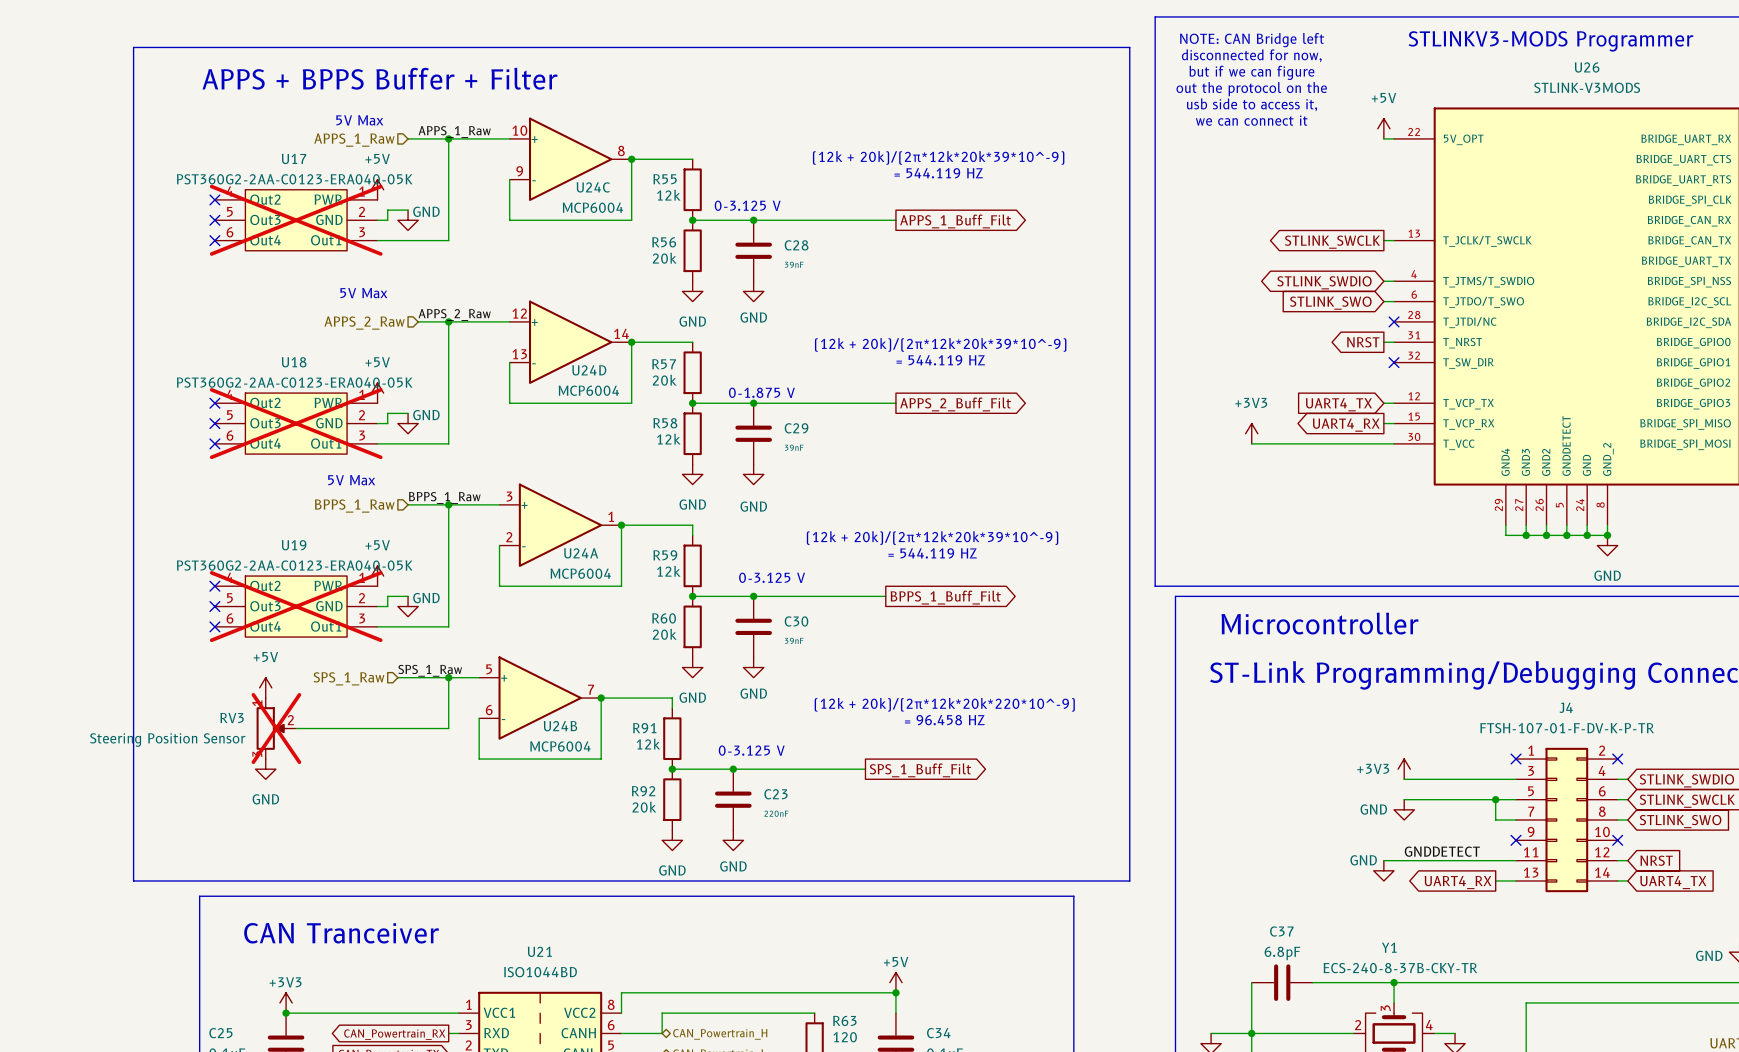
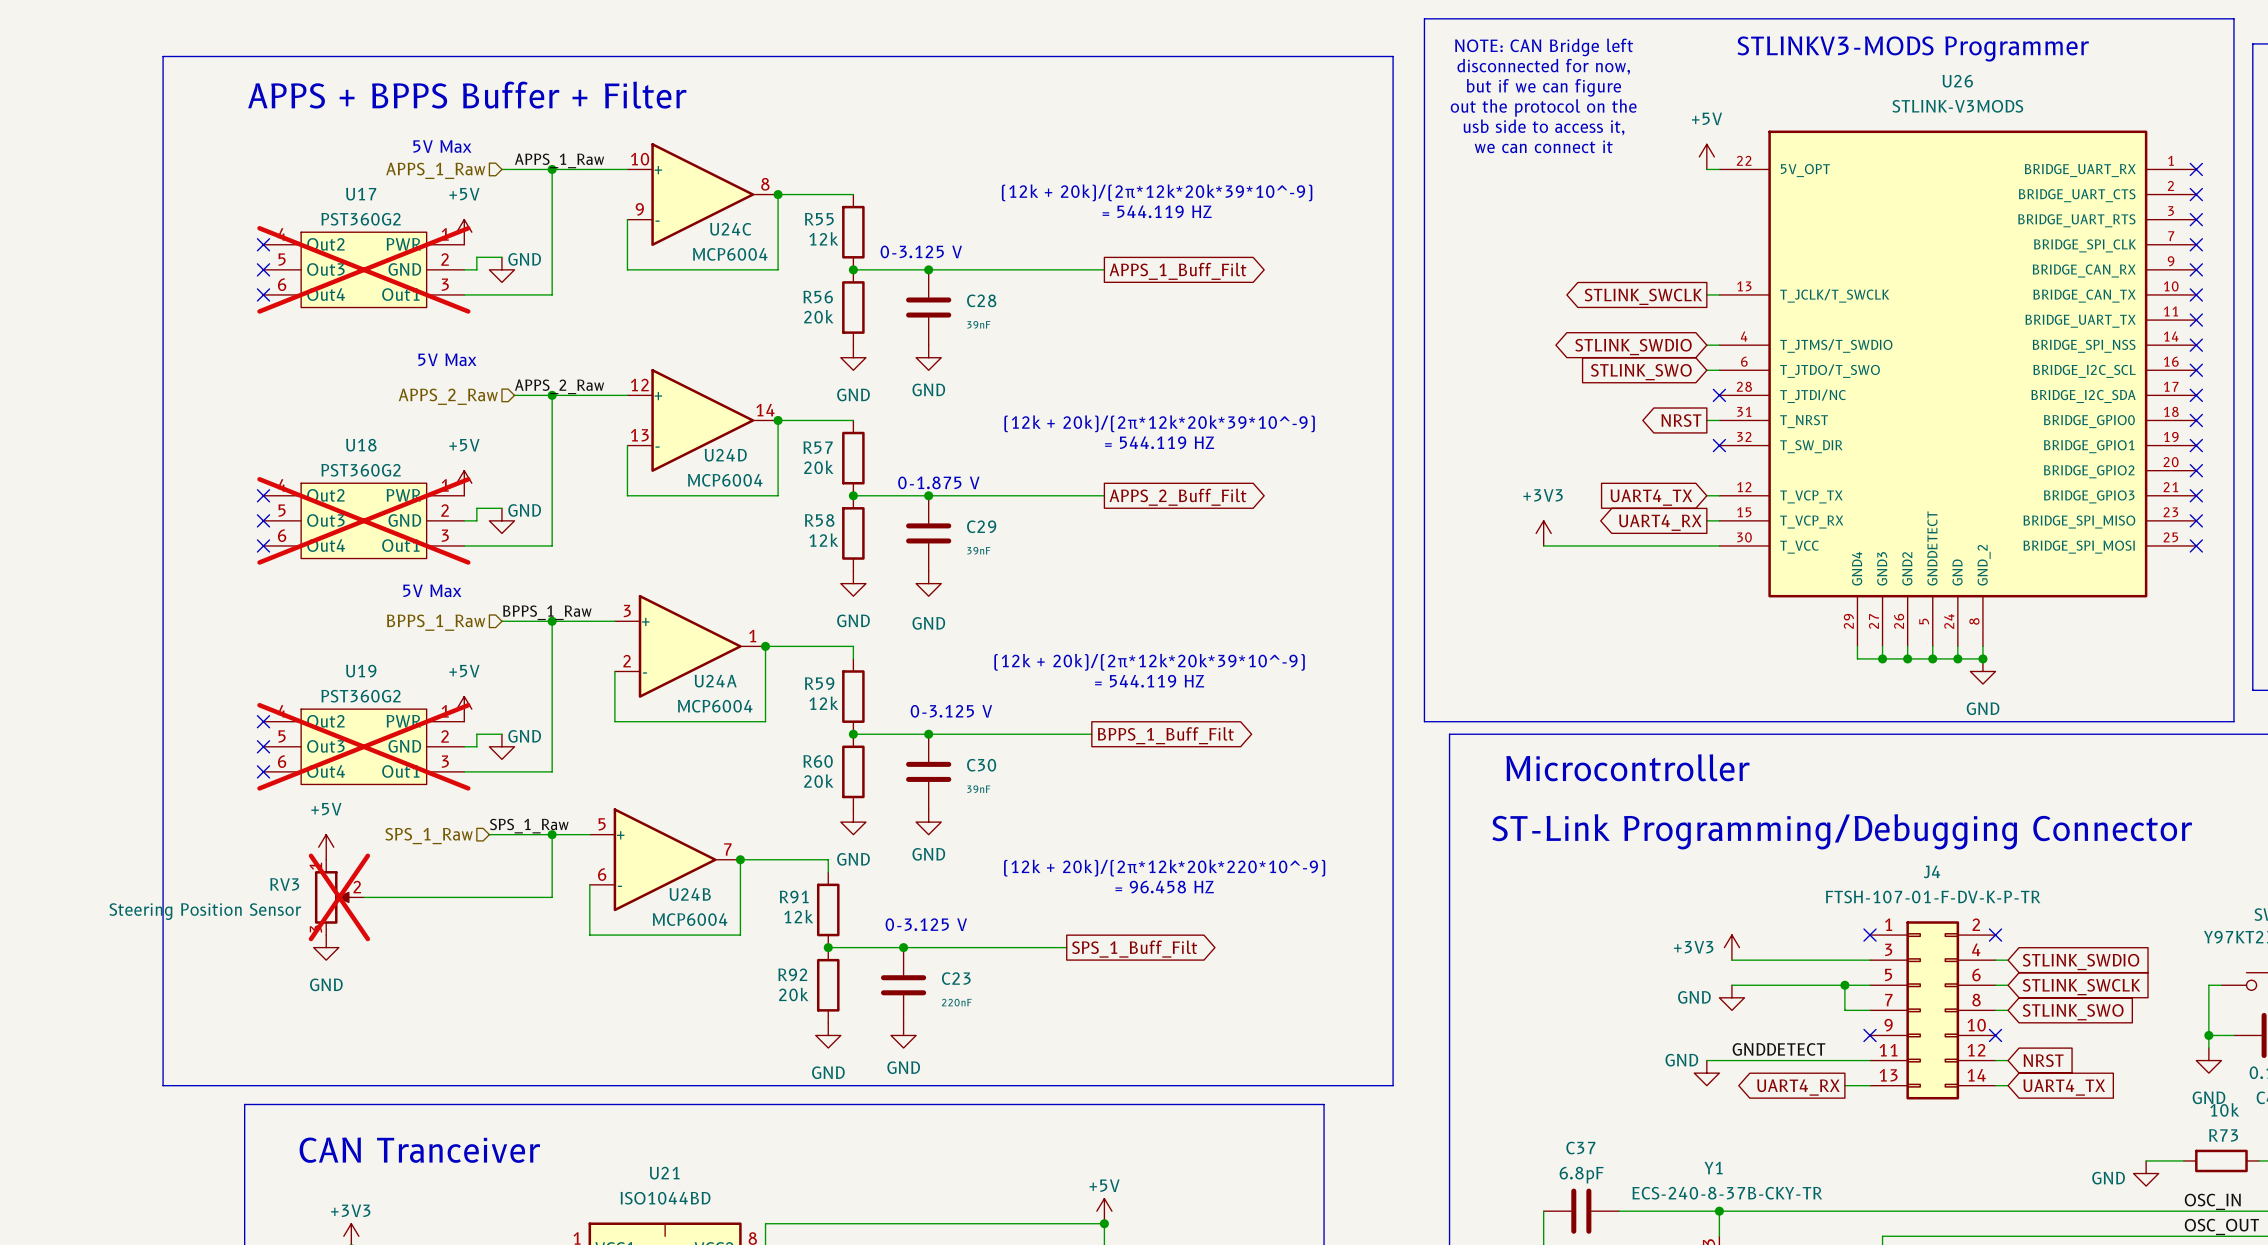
U17 value: PST360G2-2AA-C0123-ERA040-05K (294, 179) -> PST360G2 (361, 219)
U18 value: PST360G2-2AA-C0123-ERA040-05K (294, 382) -> PST360G2 (361, 470)
U19 value: PST360G2-2AA-C0123-ERA040-05K (294, 565) -> PST360G2 (361, 696)

